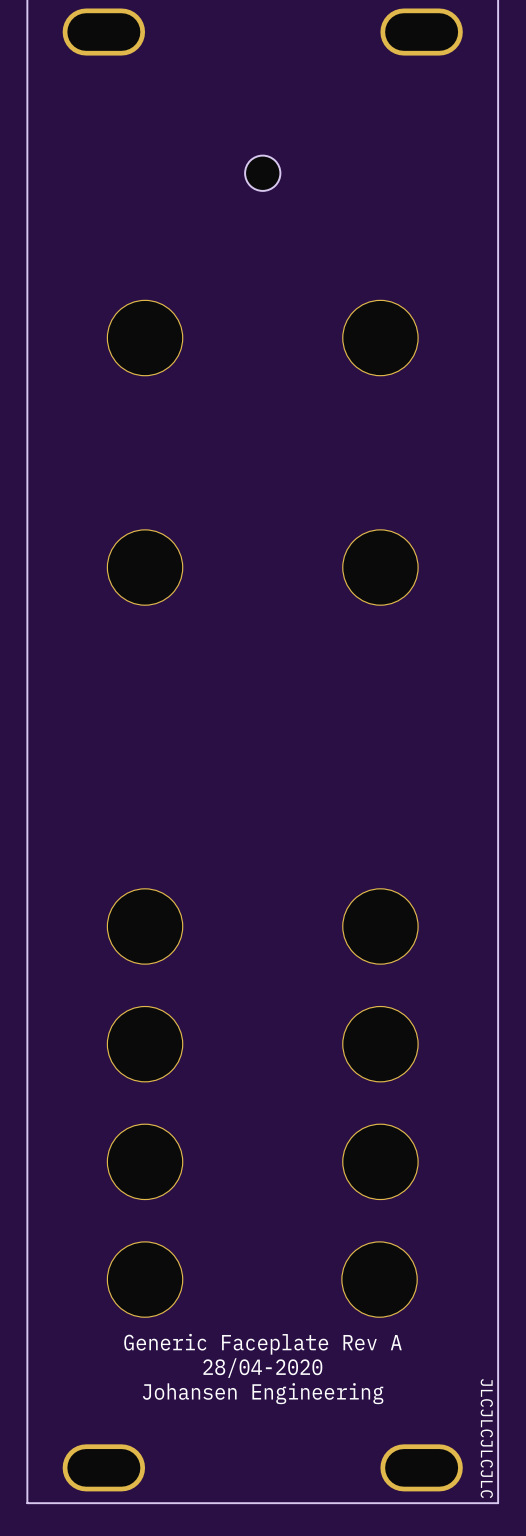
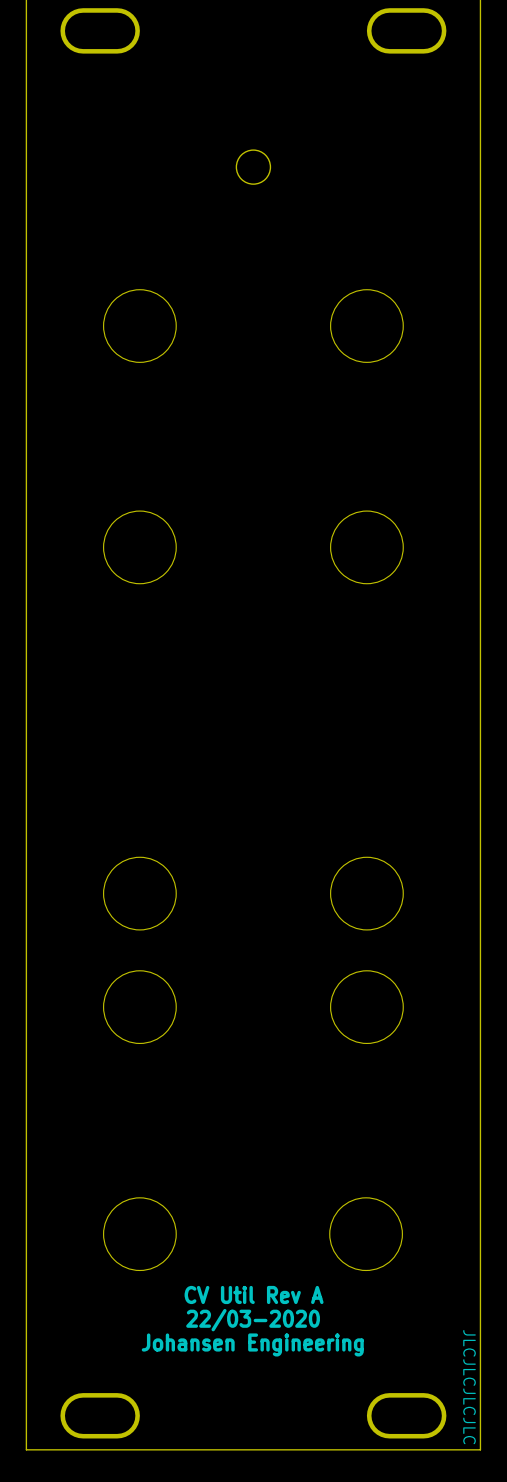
part: (145, 1161) -> none
part: (380, 1161) -> none
text: Generic Faceplate Rev A (263, 1344) -> CV Util Rev A (254, 1294)
text: 28/04-2020 (262, 1368) -> 22/03-2020 (253, 1320)

